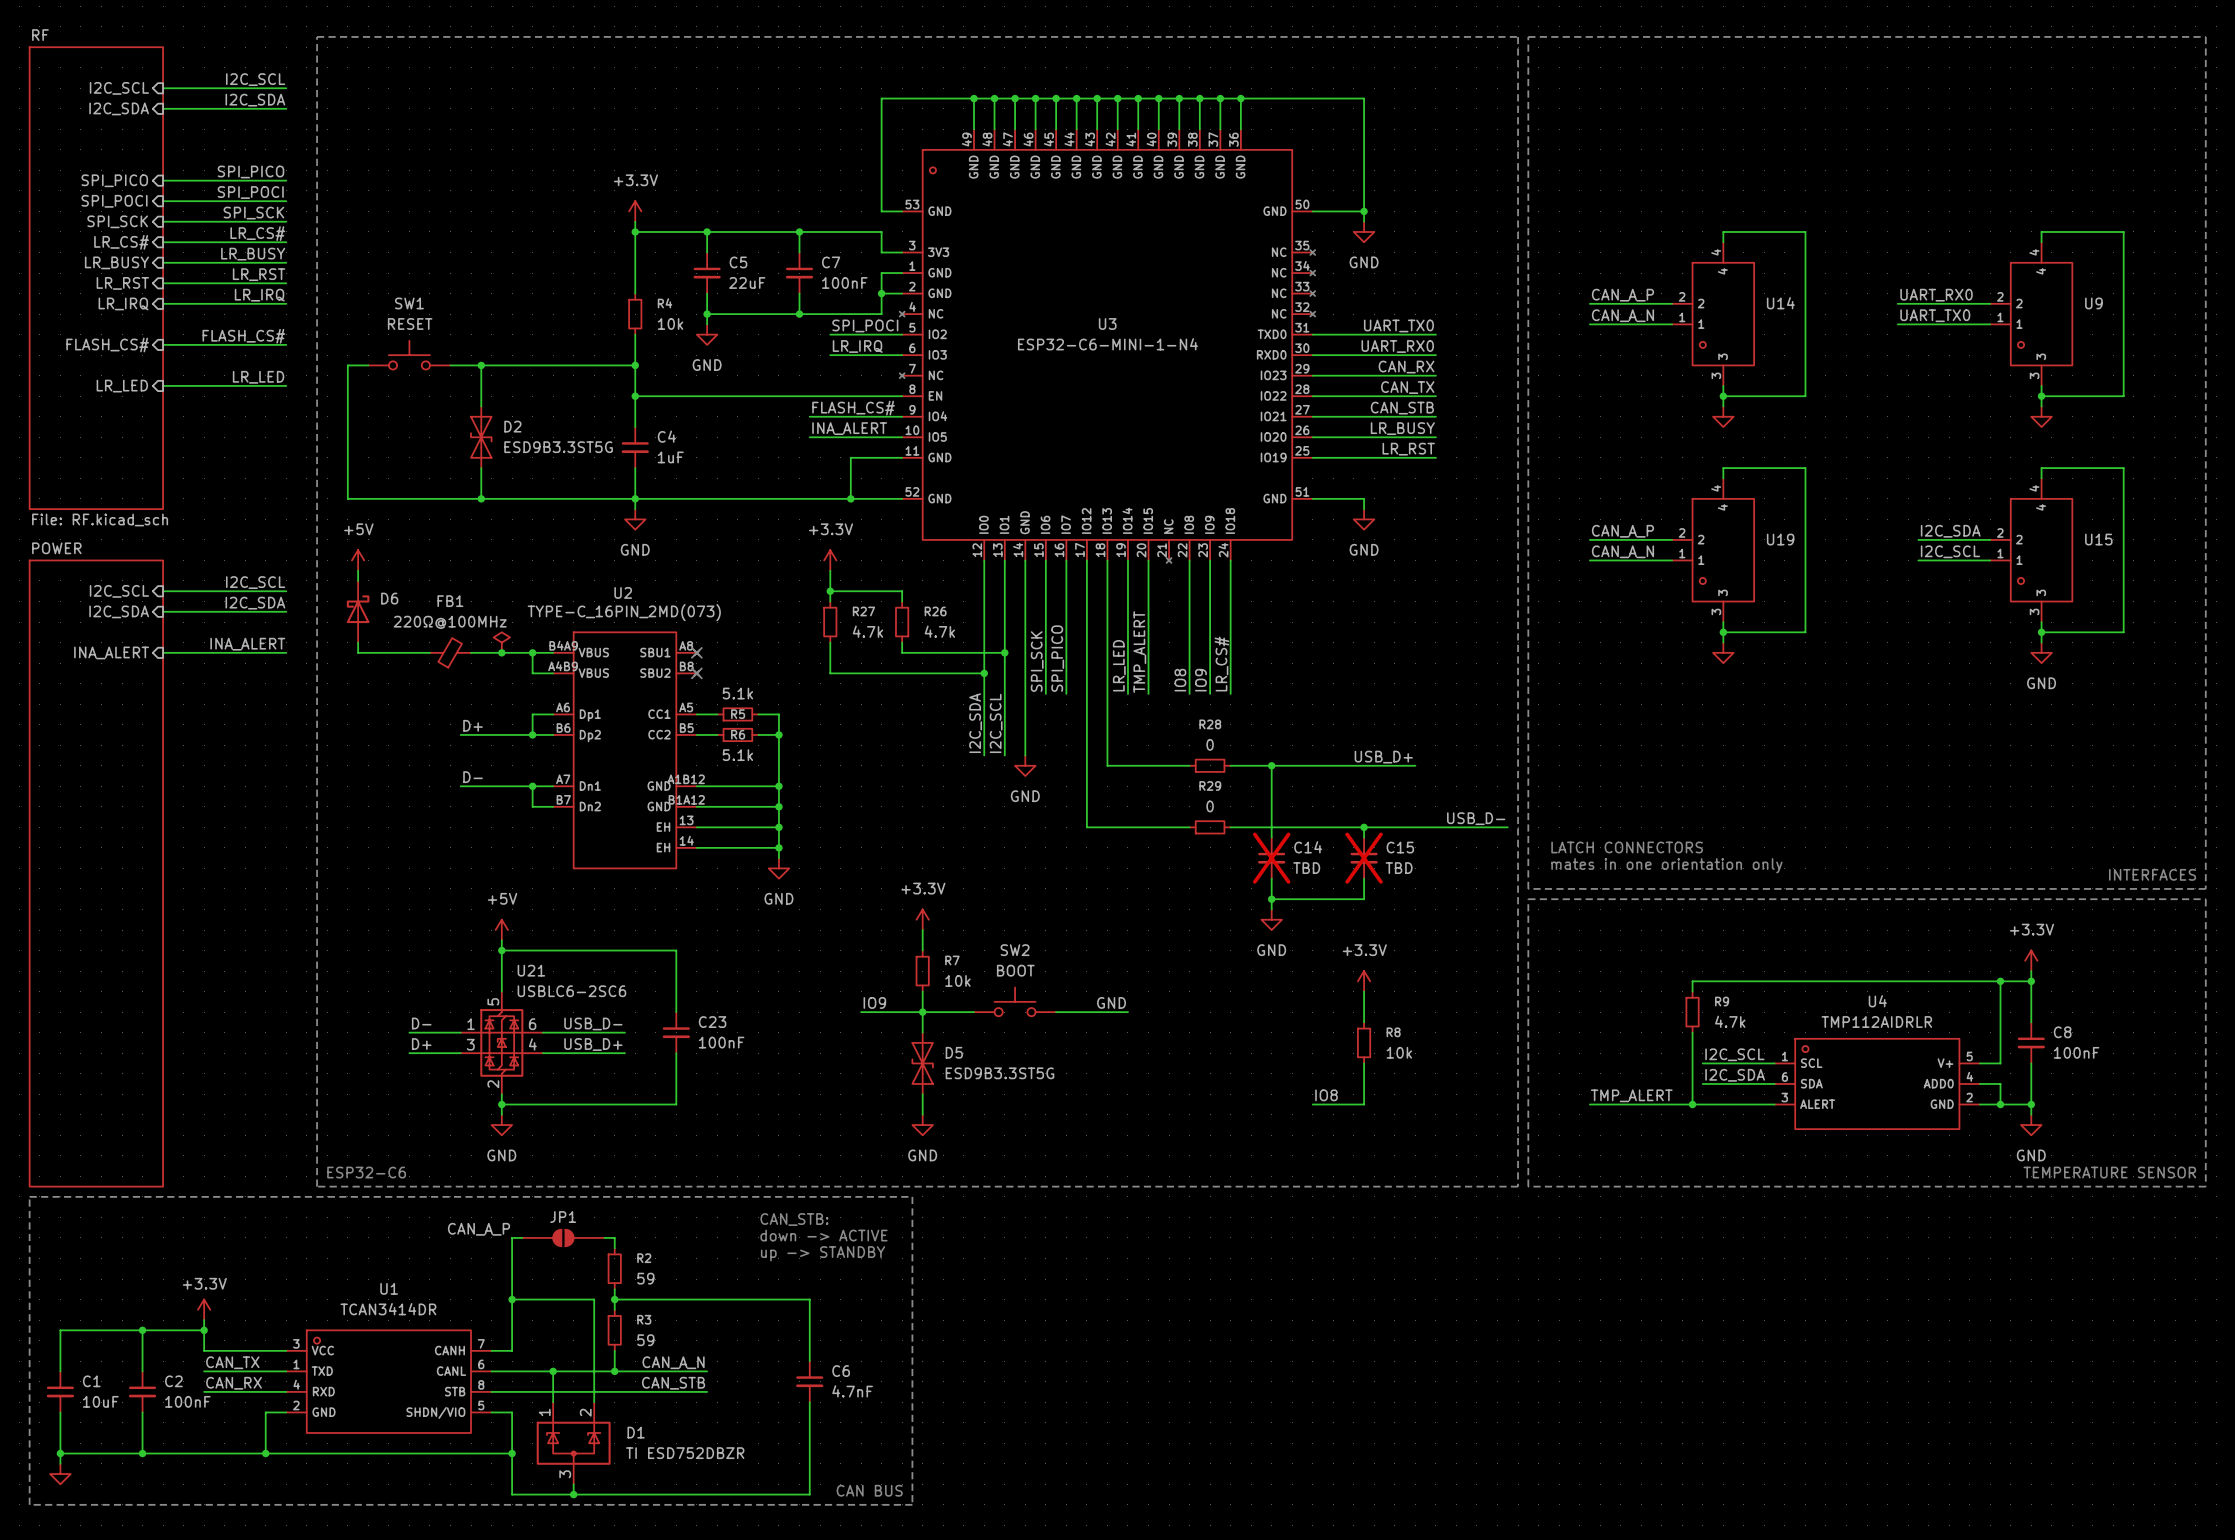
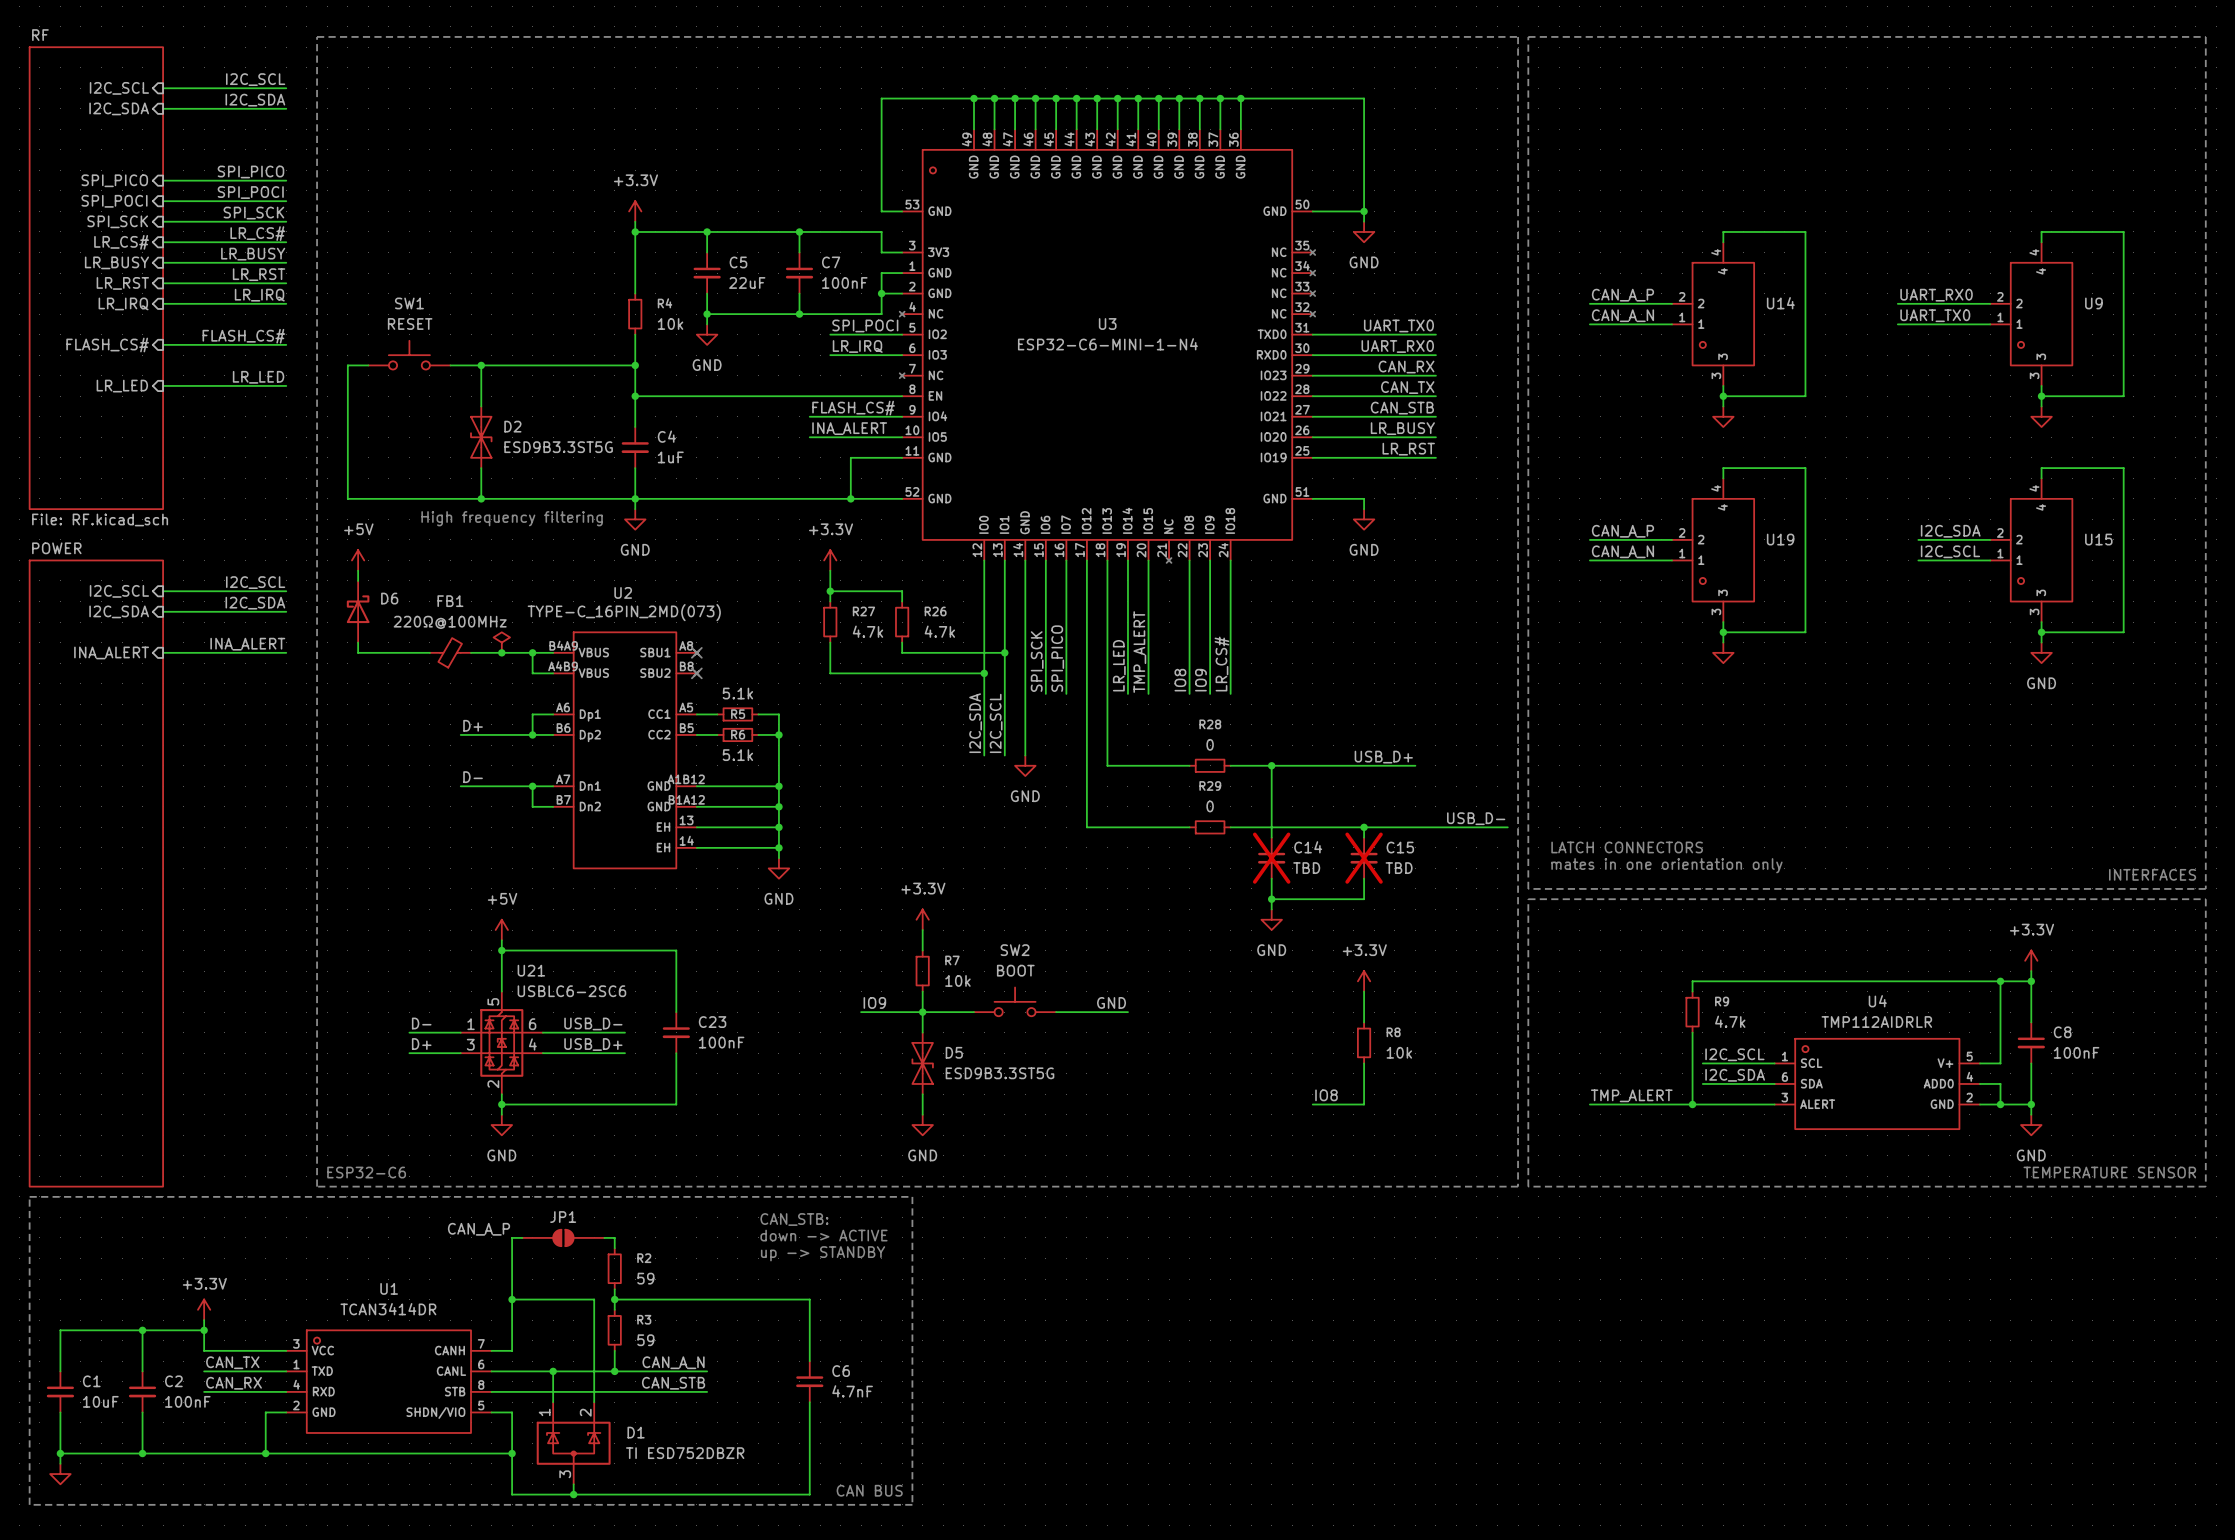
text: none -> High frequency filtering (512, 518)

